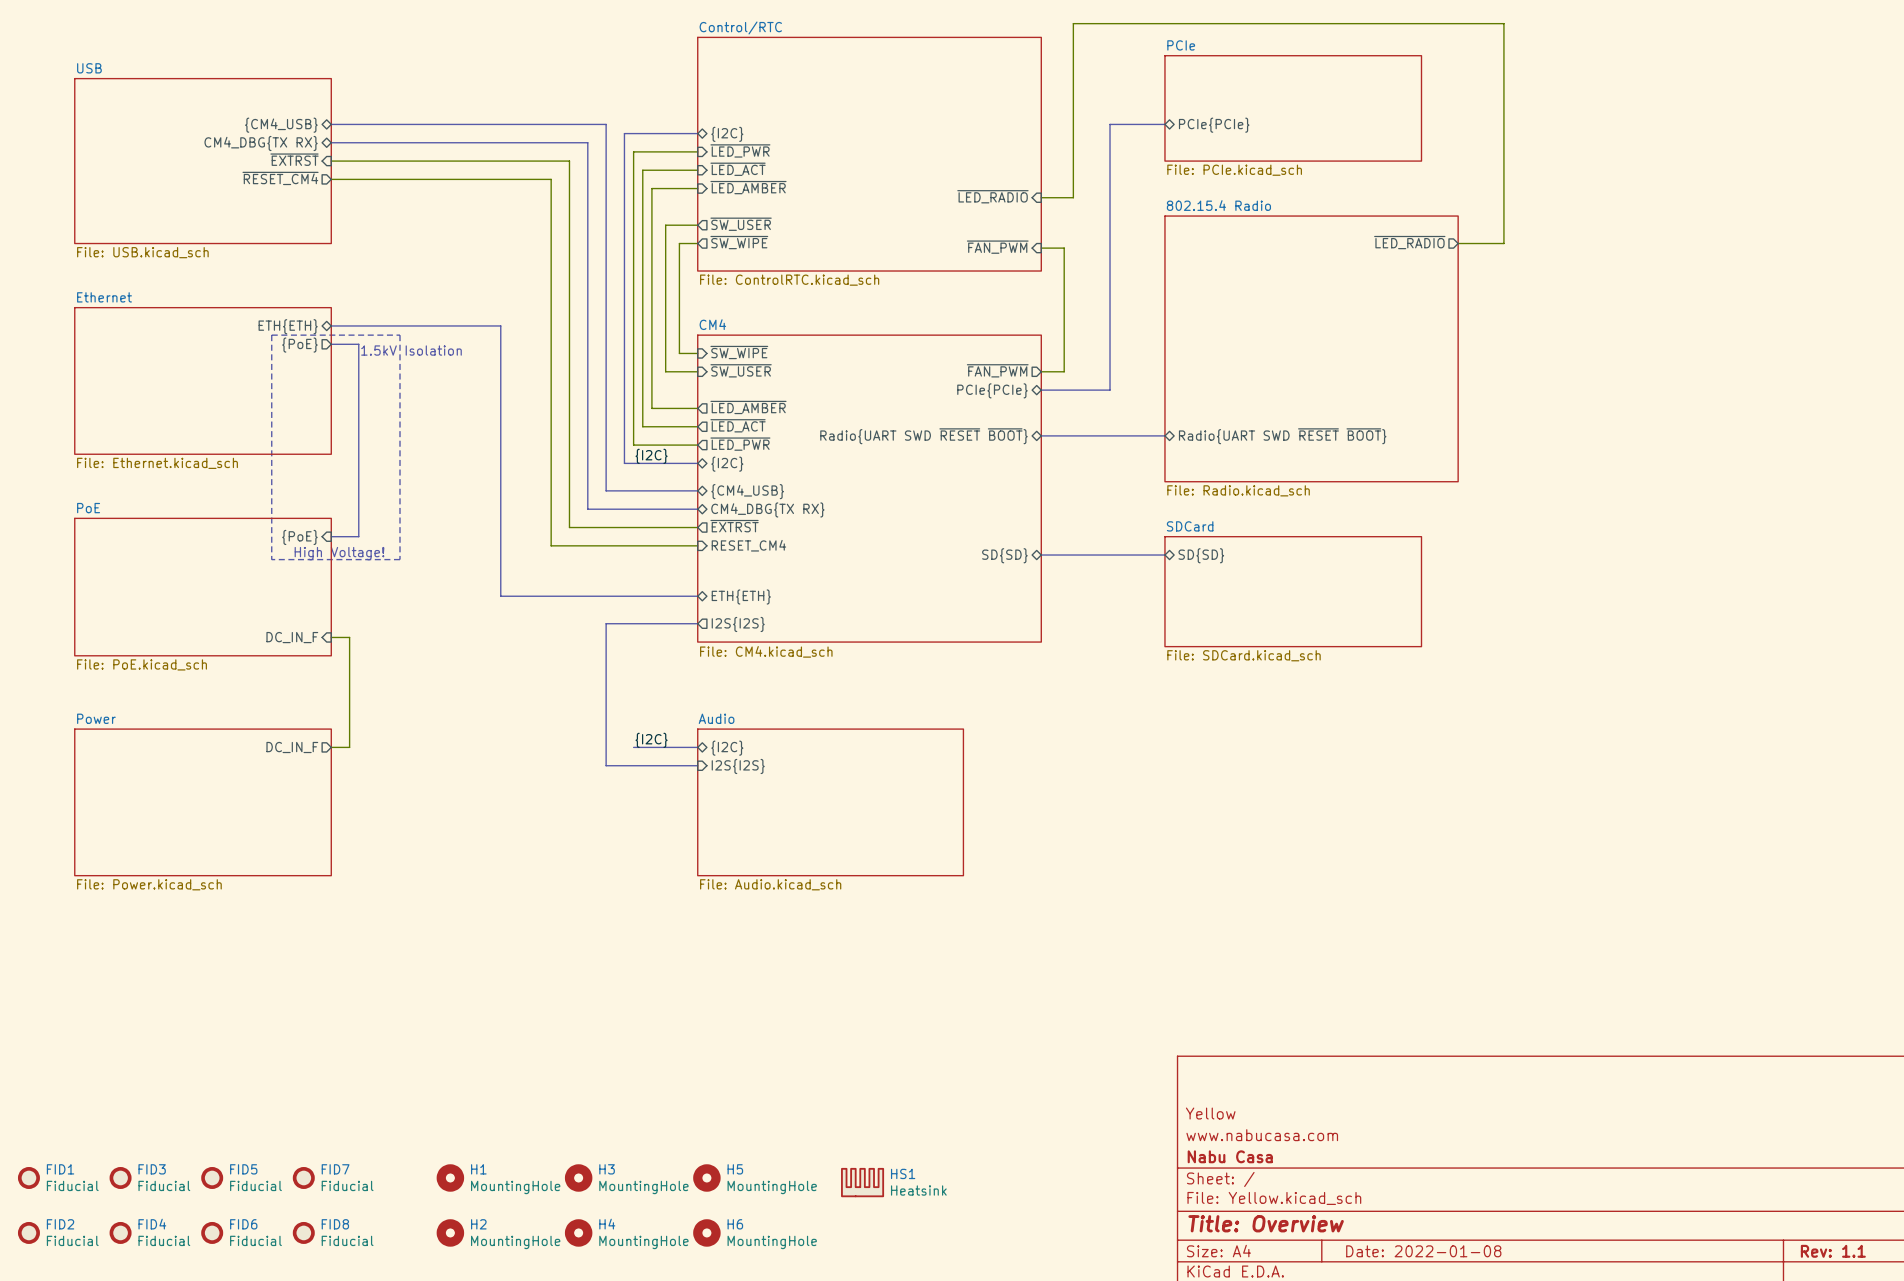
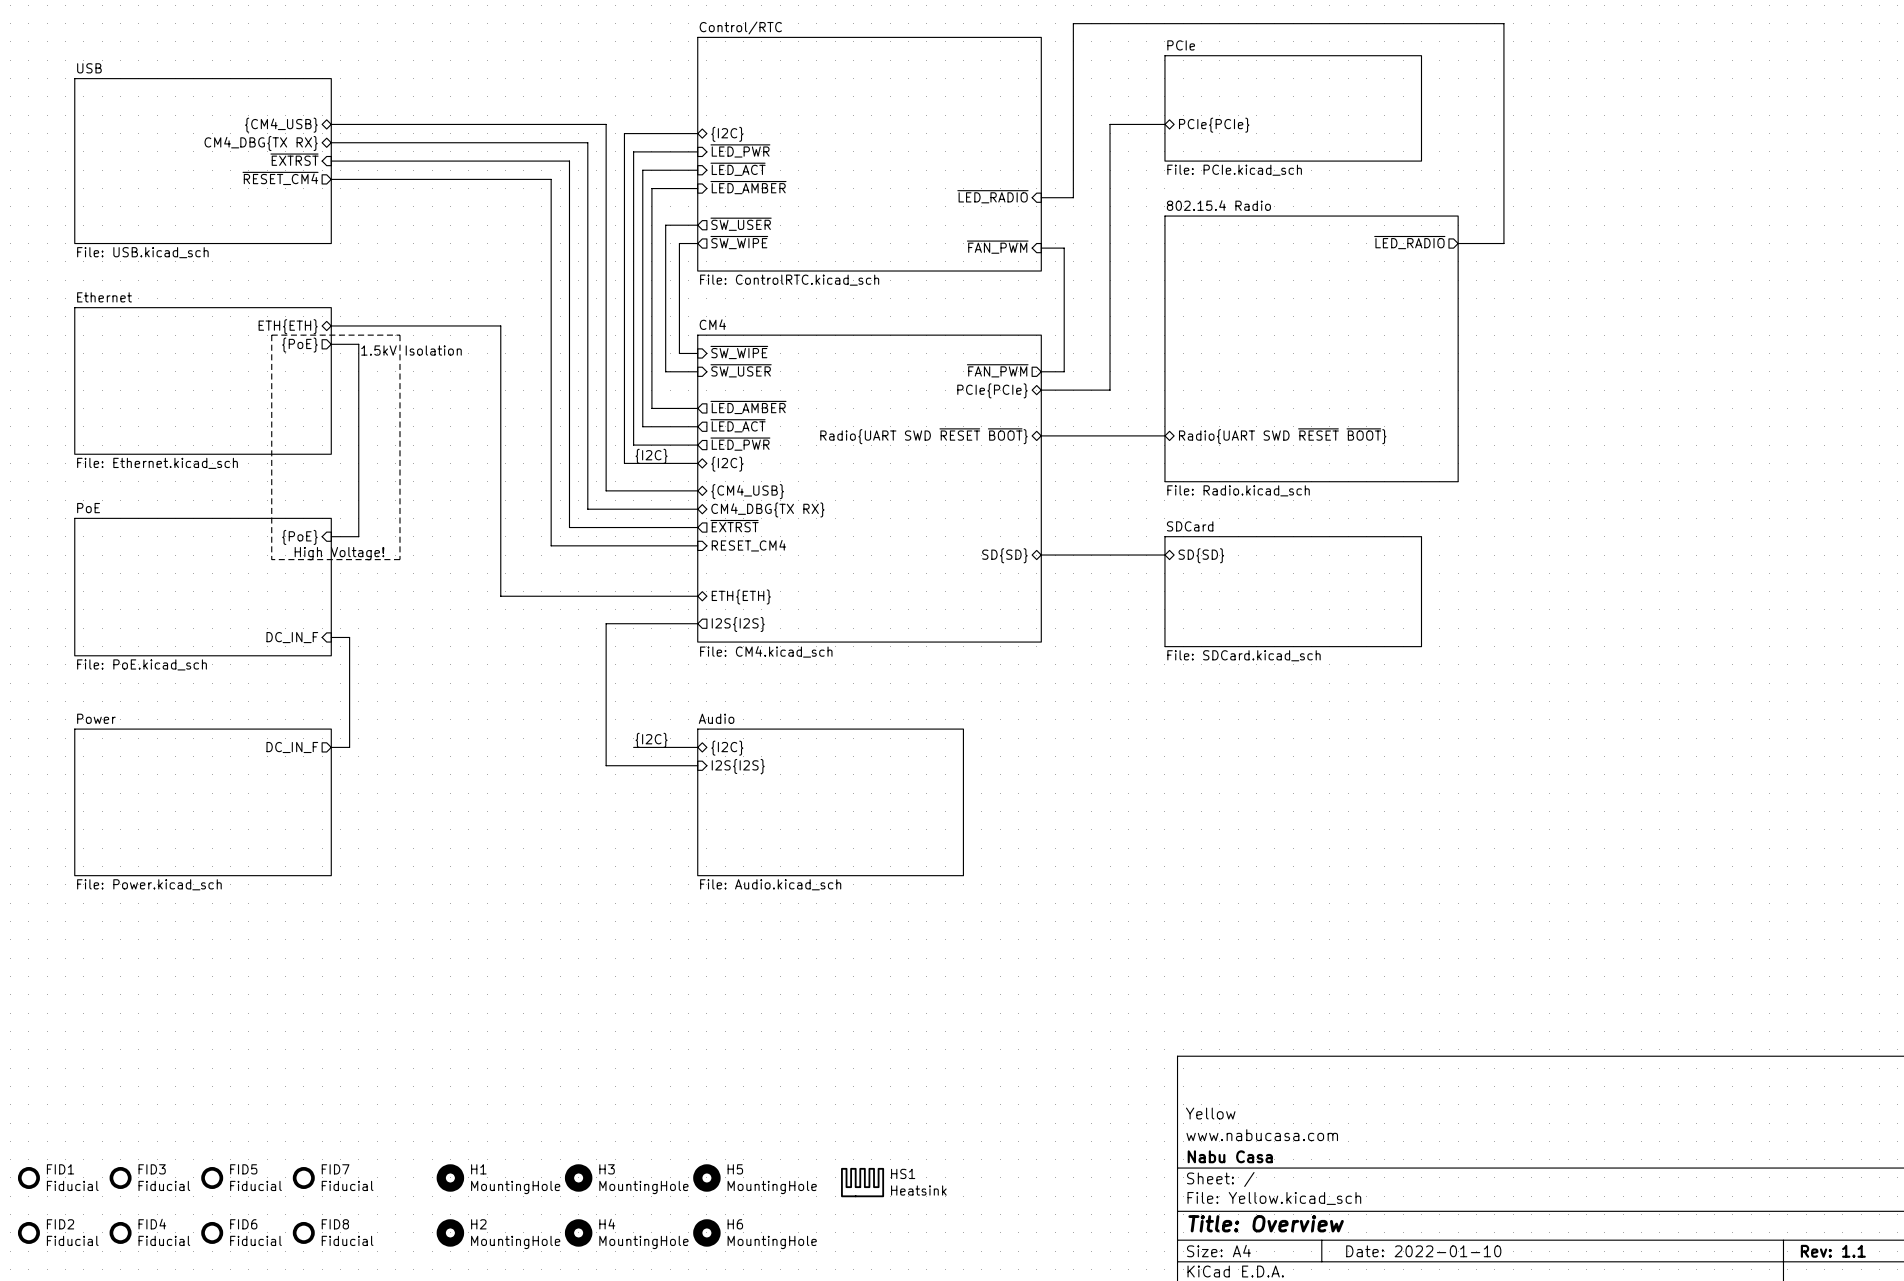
title block: Date: 2022-01-08 (1423, 1251) -> Date: 2022-01-10 (1423, 1251)

